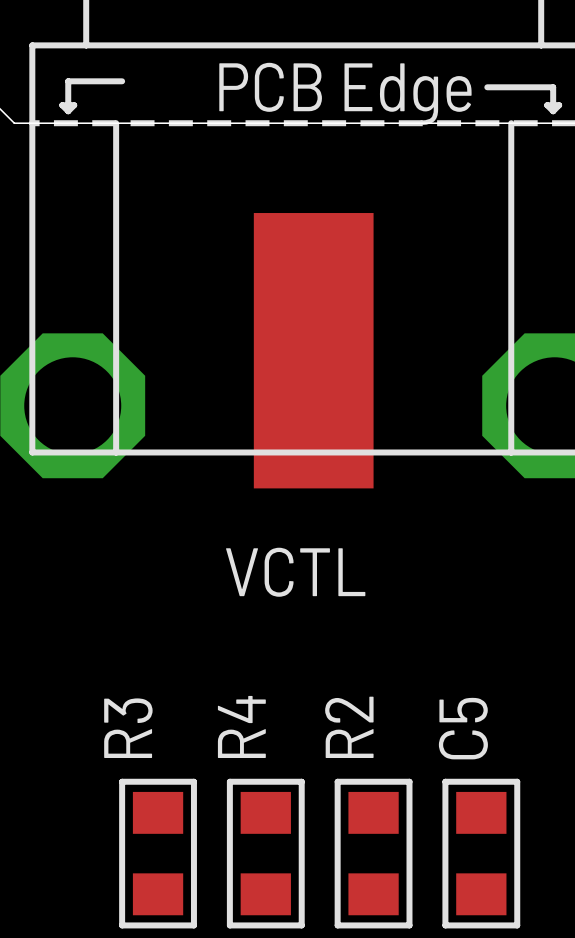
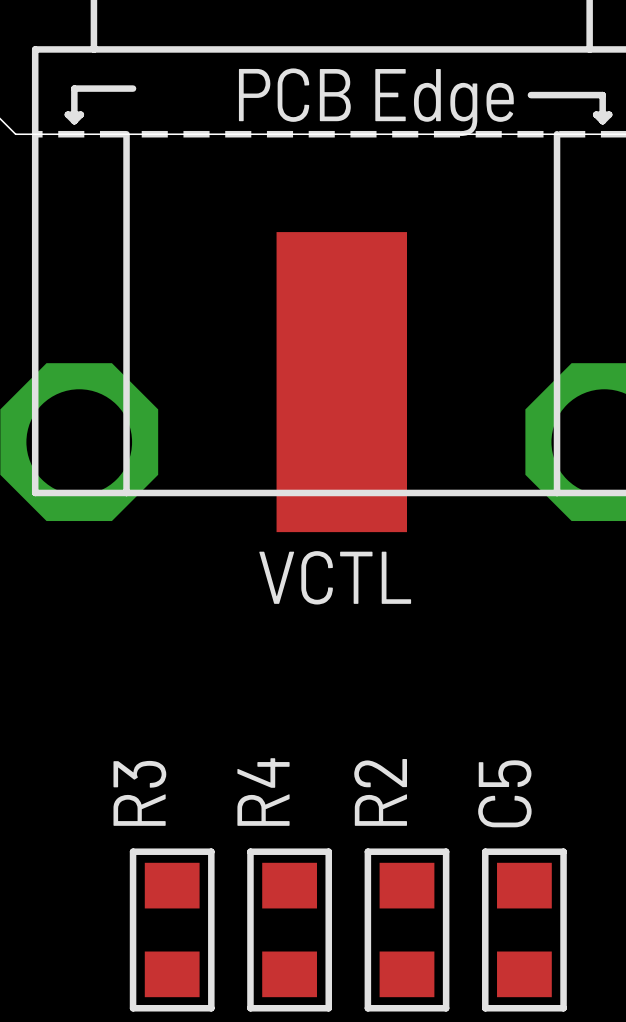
VCTL name position: VCTL (295, 572) -> VCTL (335, 577)

